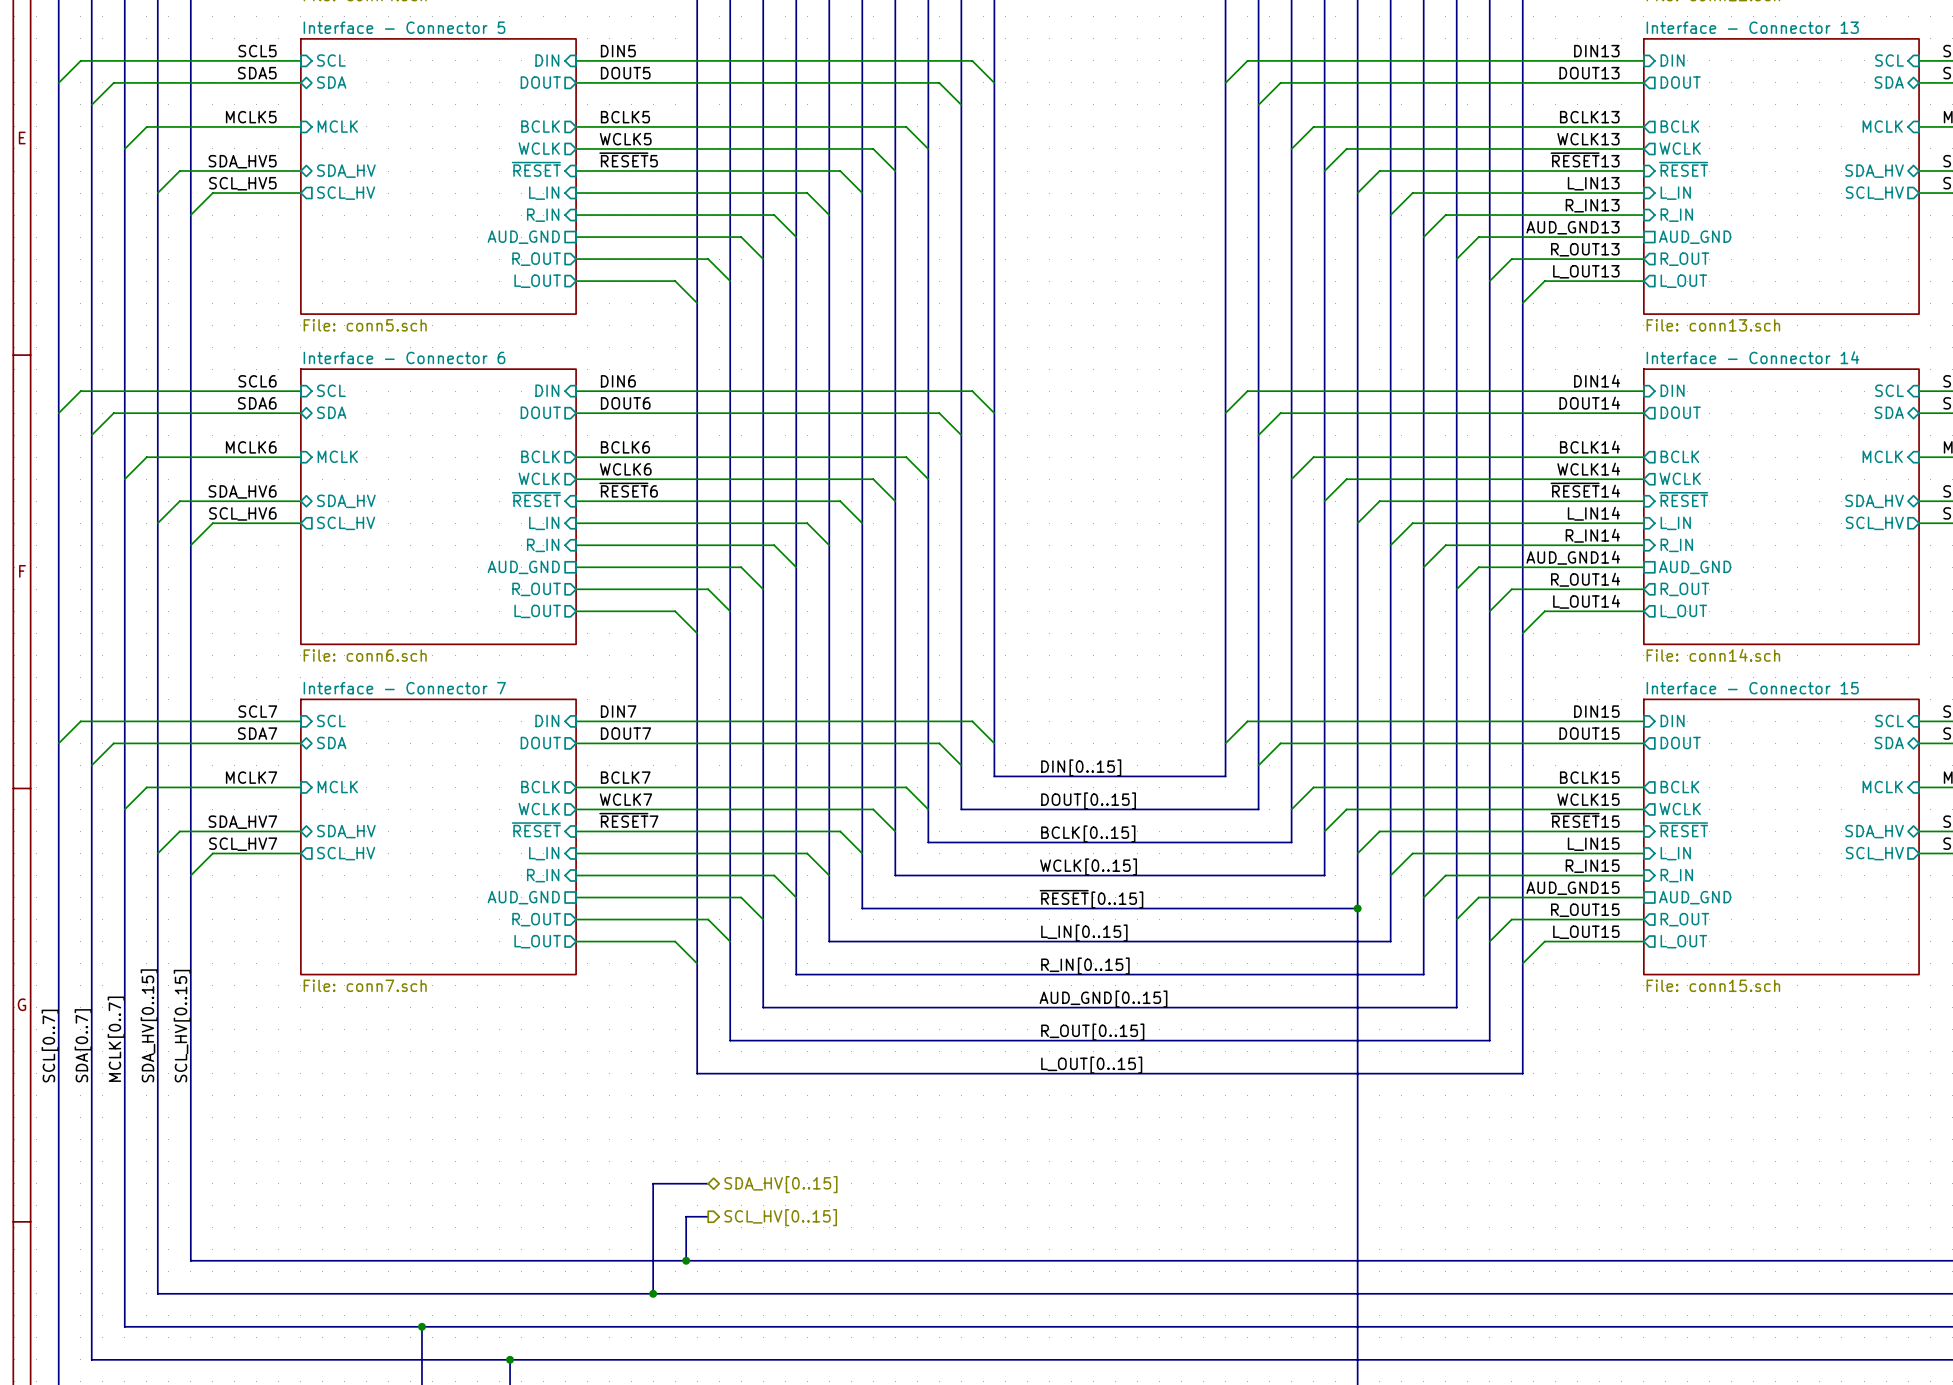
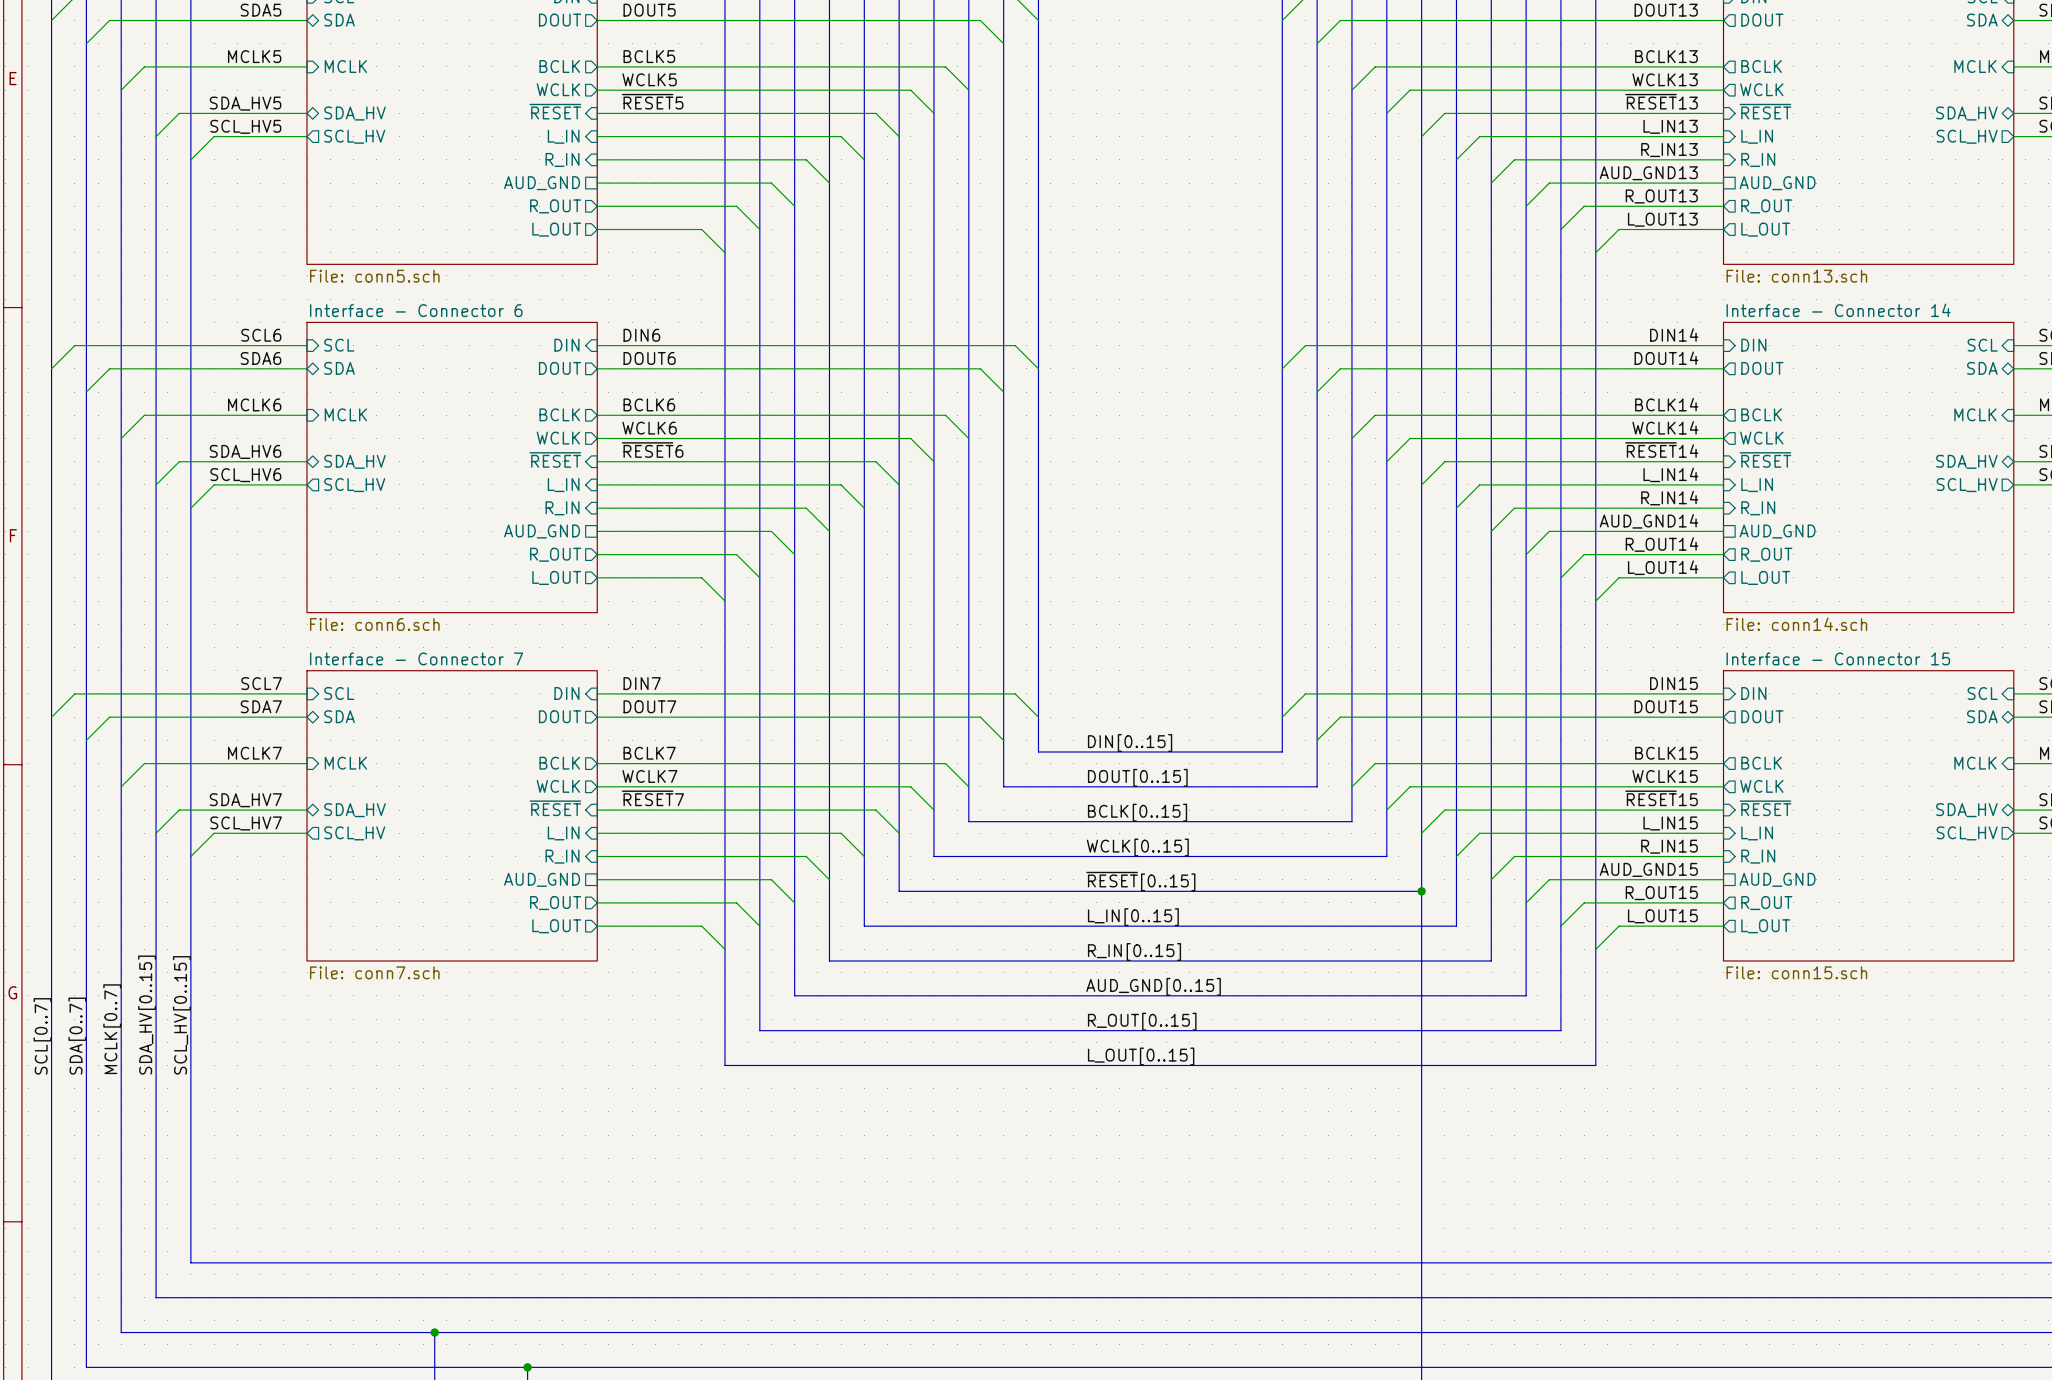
bus: (708, 1183) (653, 1183) (653, 1293) -> none
hierarchical label: SDA_HV[0..15] (780, 1184) -> none
bus: (708, 1216) (686, 1216) (686, 1260) -> none
hierarchical label: SCL_HV[0..15] (780, 1217) -> none
junction: (686, 1260) -> none
junction: (653, 1293) -> none

